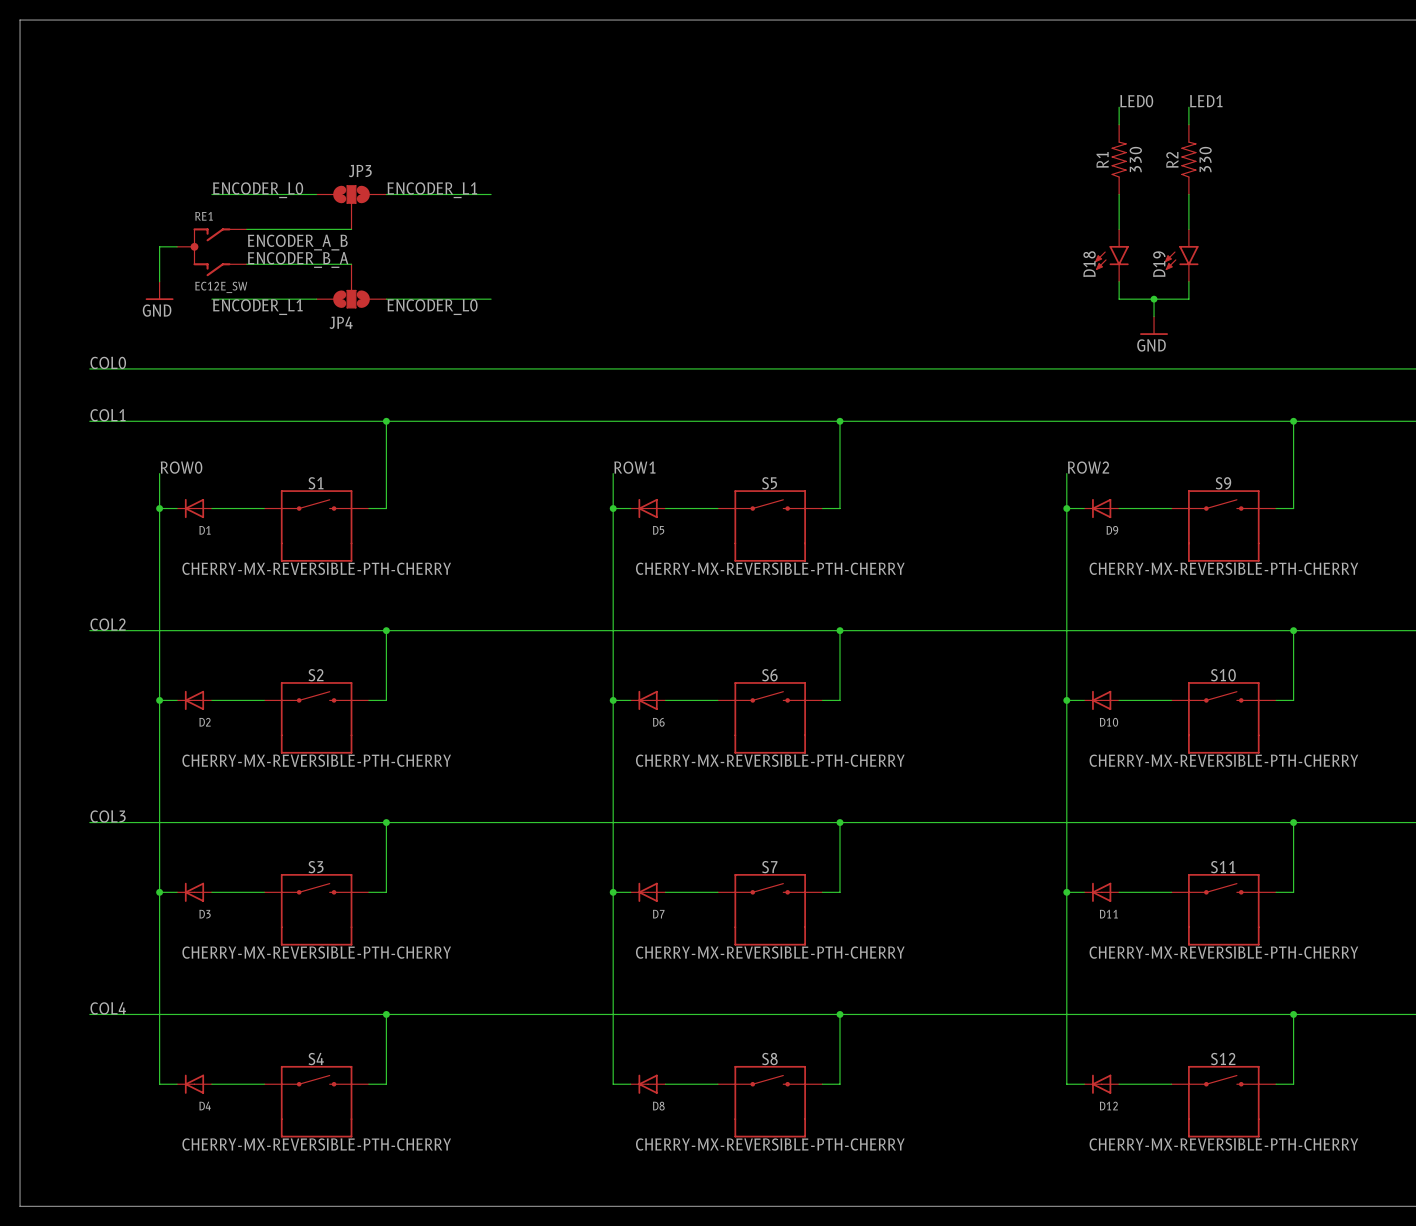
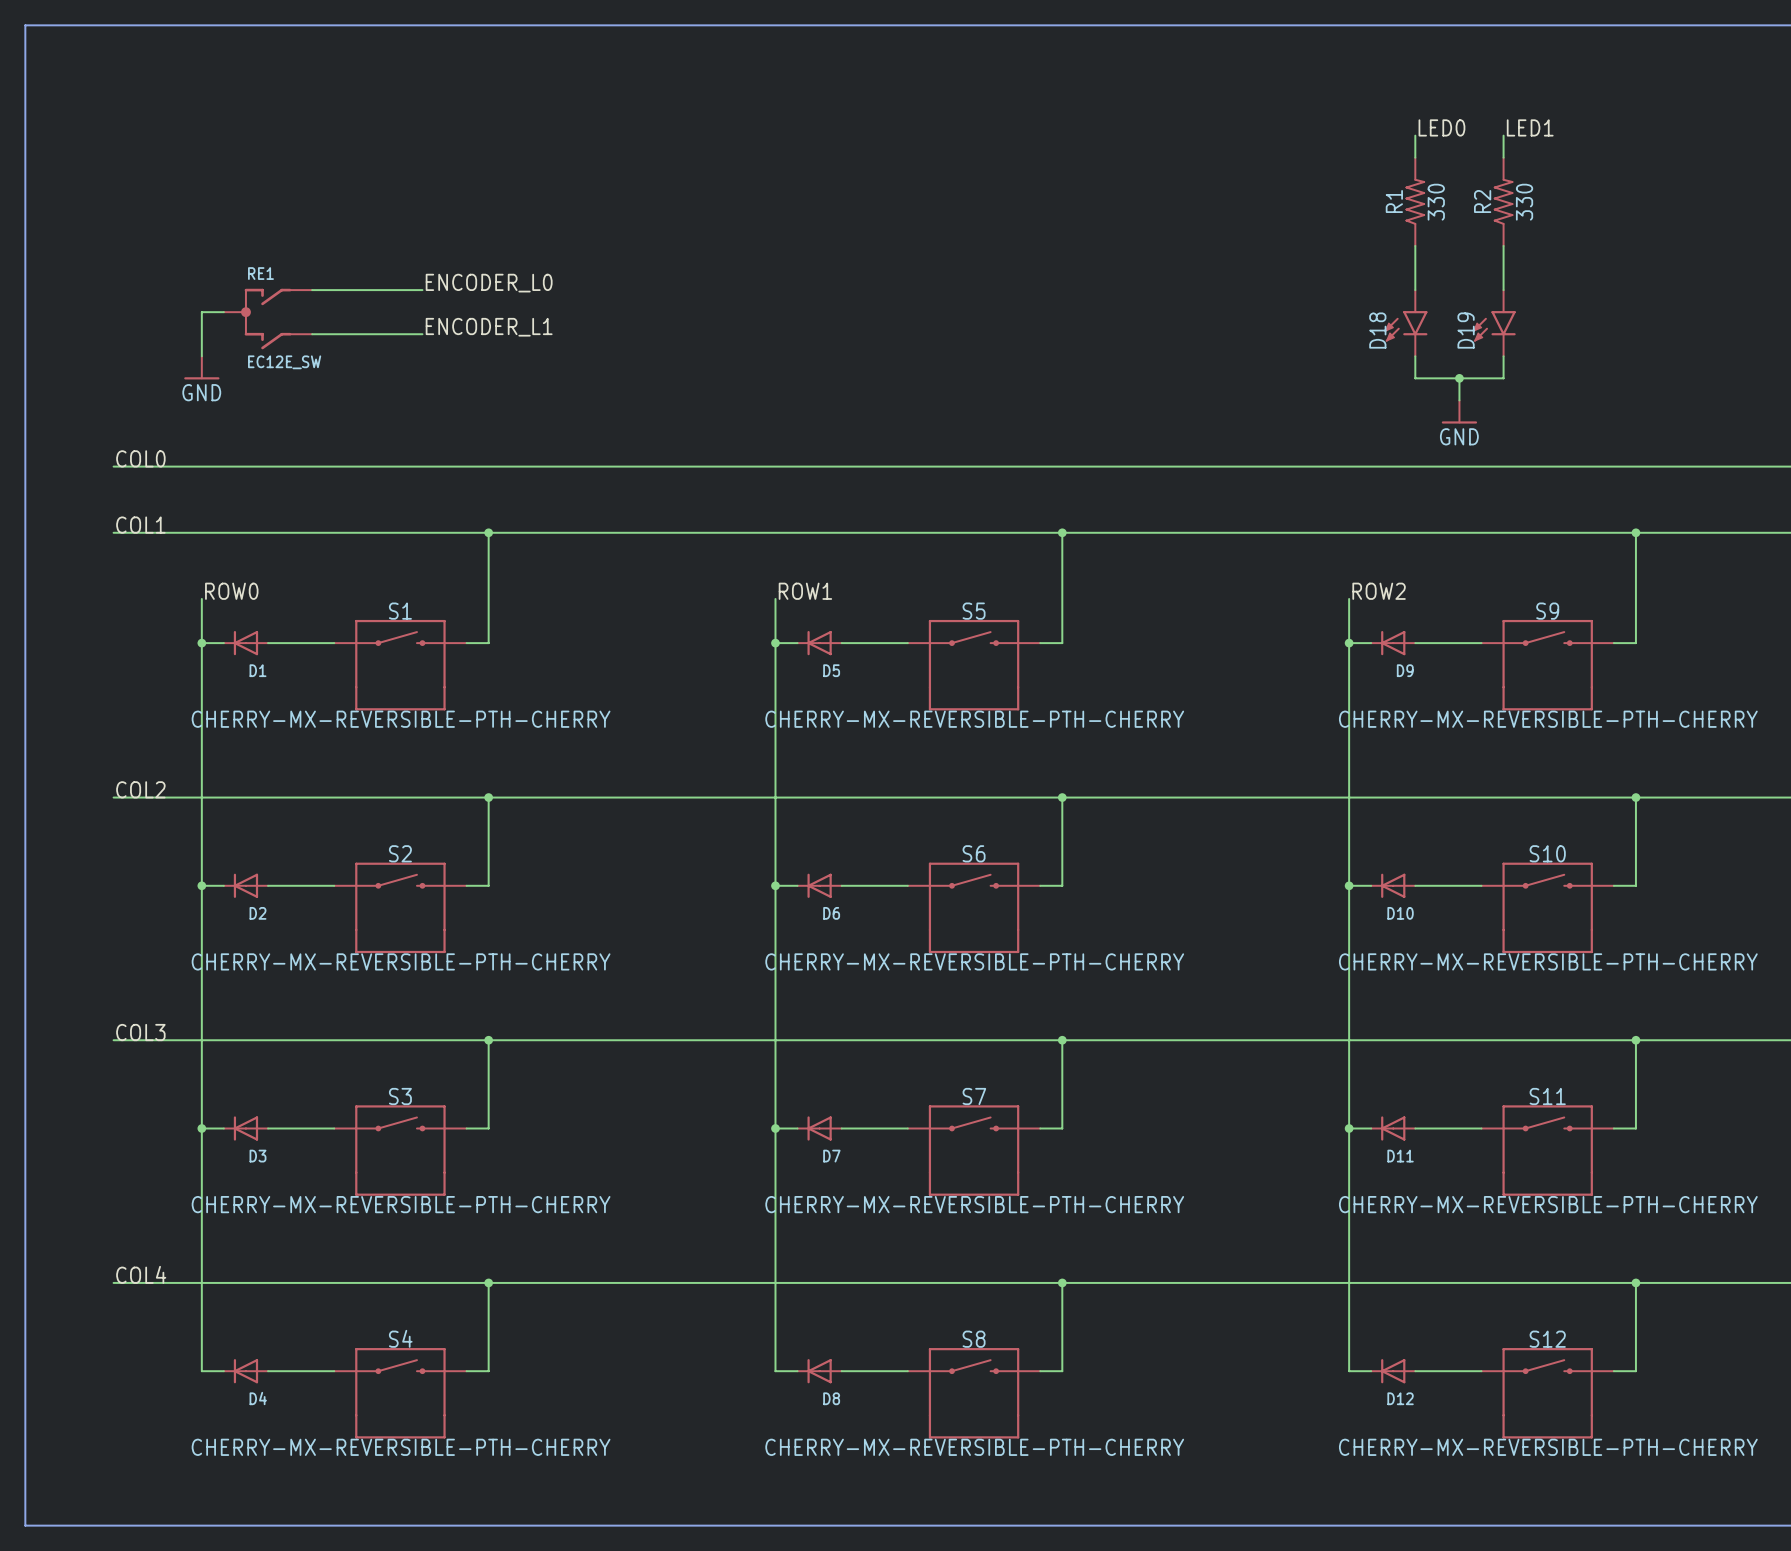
label: ENCODER_L0 (258, 190) -> none
label: ENCODER_L1 (432, 190) -> none
wire: (211, 194) (316, 194) -> none
wire: (386, 194) (491, 194) -> none
JP3: (351, 207) -> none
label: none -> ENCODER_L0 (489, 283)
wire: (334, 229) (351, 229) -> none
label: ENCODER_A_B (297, 242) -> none
label: ENCODER_B_A (298, 260) -> none
label: none -> ENCODER_L1 (489, 327)
wire: (334, 264) (351, 264) -> none
JP4: (351, 286) -> none
wire: (211, 299) (316, 299) -> none
wire: (386, 299) (491, 299) -> none
label: ENCODER_L1 (257, 307) -> none
label: ENCODER_L0 (432, 307) -> none

